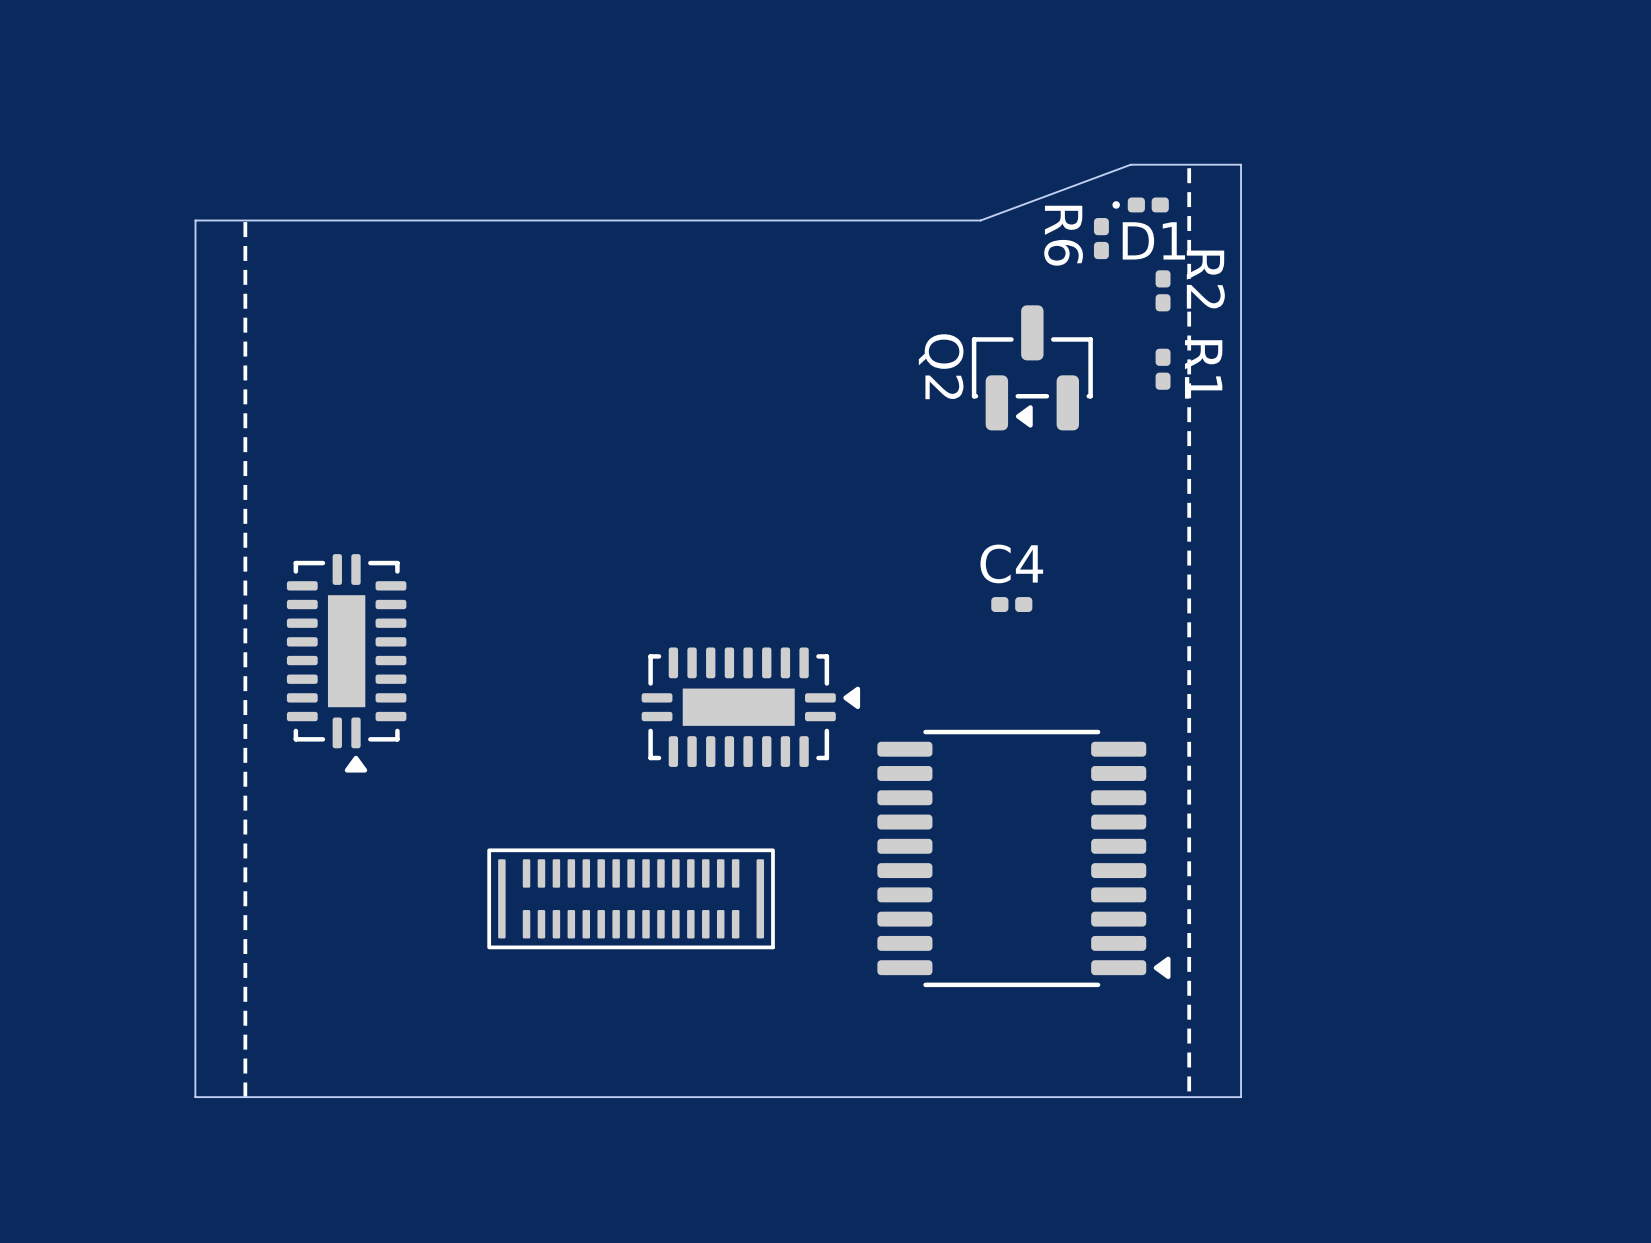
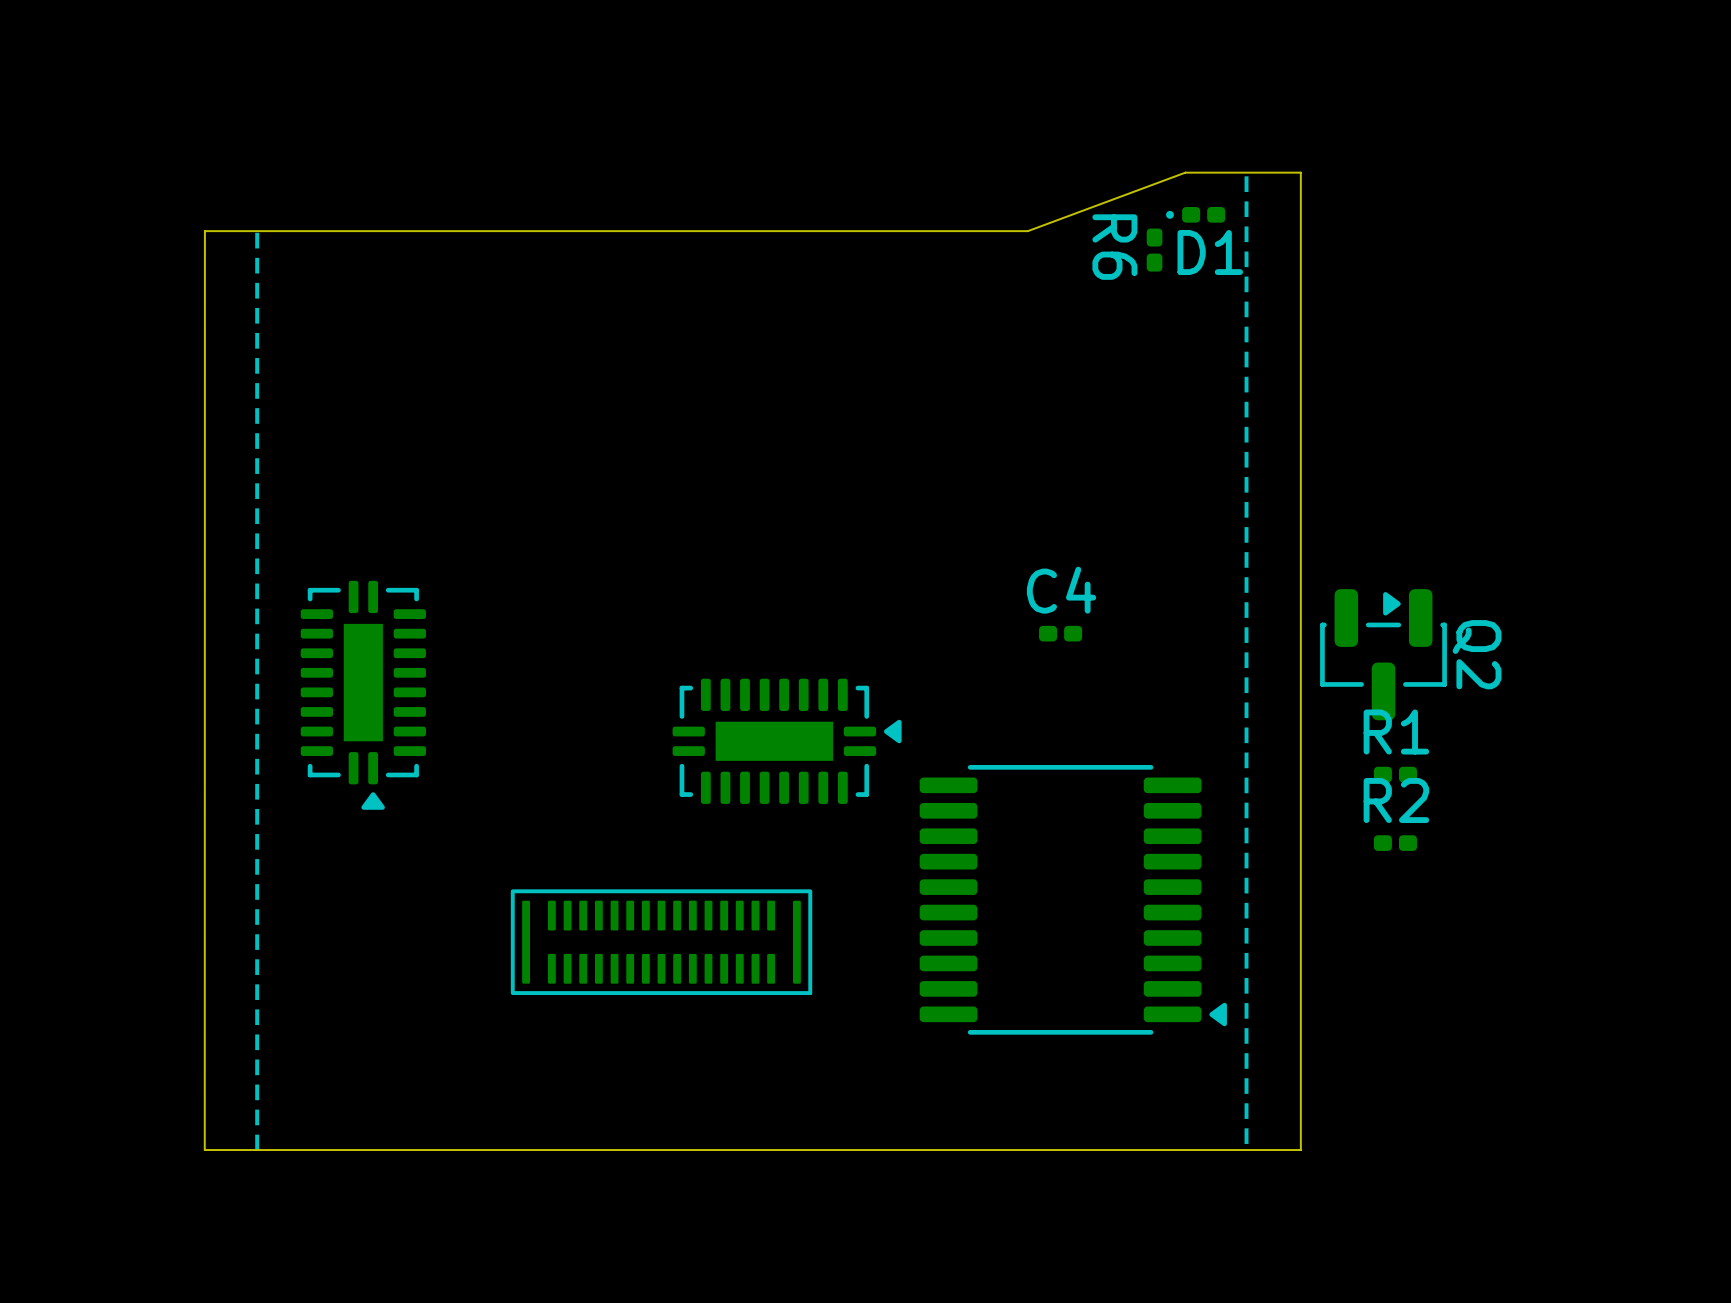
R2 rotation: 0° (1163, 290) -> 90° clockwise (1395, 843)
R2 position: (1163, 290) -> (1395, 843)
Q2 rotation: 0° (1032, 367) -> 180° (1383, 654)
Q2 position: (1032, 367) -> (1383, 654)
R1 rotation: 0° (1163, 369) -> 90° clockwise (1395, 774)
R1 position: (1163, 369) -> (1395, 774)

